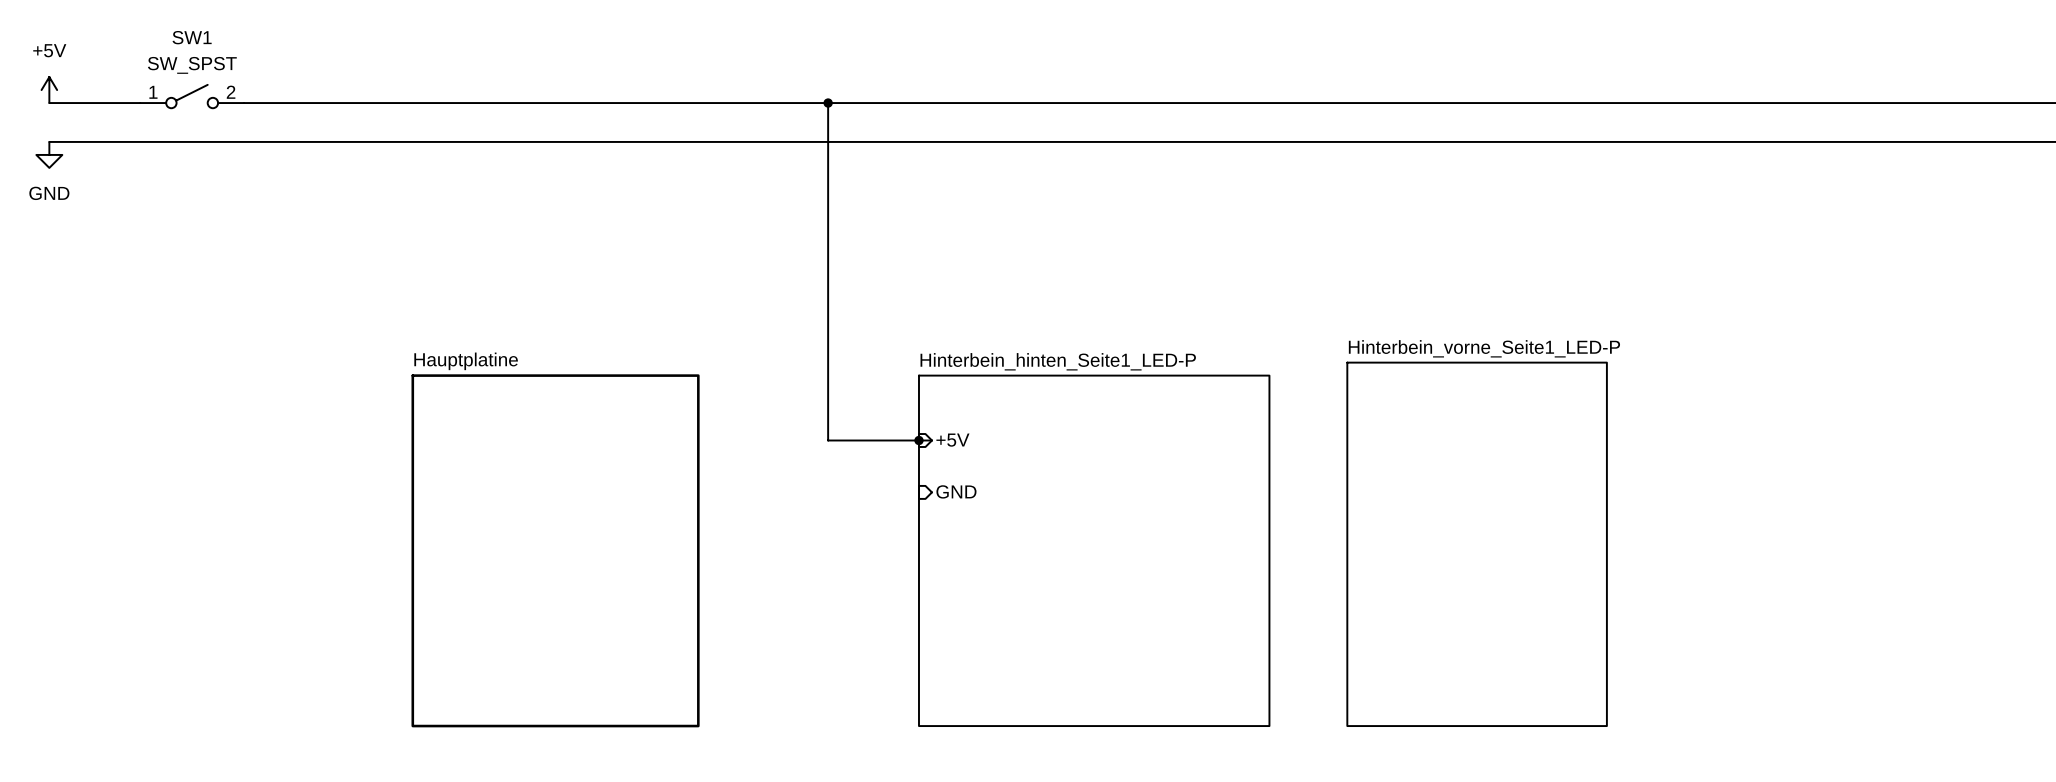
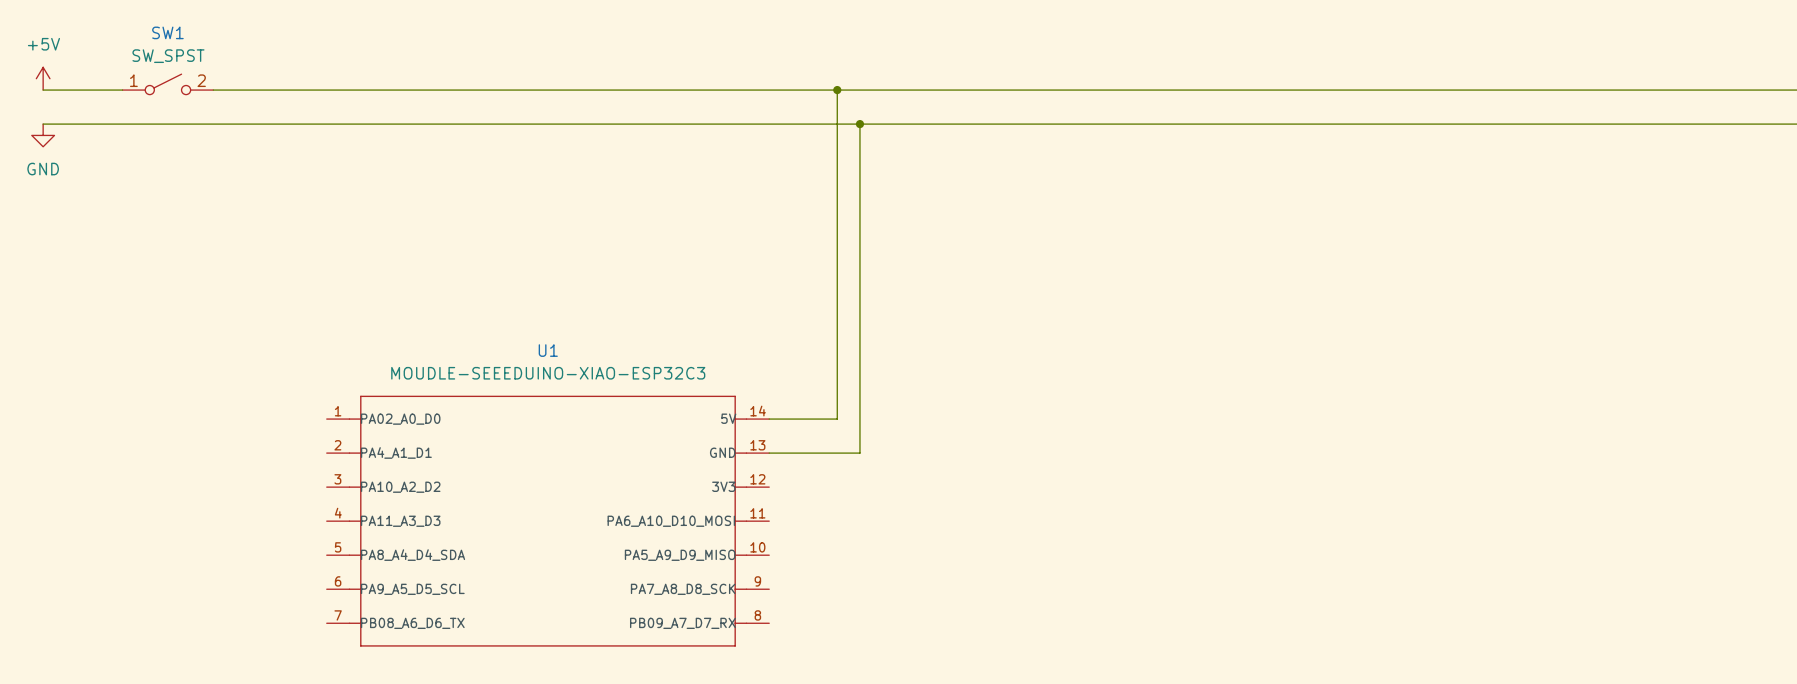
wire: (828, 103) (828, 440) (931, 440) -> none
junction: (828, 103) -> none
wire: none -> (837, 90) (837, 419) (769, 419)
junction: none -> (837, 90)
wire: none -> (859, 124) (859, 453) (769, 453)
junction: none -> (859, 124)
junction: (918, 440) -> none
sheet pin: +5V (952, 440) -> none
sheet pin: GND (956, 491) -> none
sheet Hinterbein_vorne_Seite1_LED-P: (1477, 544) -> none
sheet Hauptplatine: (555, 550) -> none
sheet Hinterbein_hinten_Seite1_LED-P: (1094, 550) -> none
U1: none -> MOUDLE-SEEEDUINO-XIAO-ESP32C3 (547, 521)

